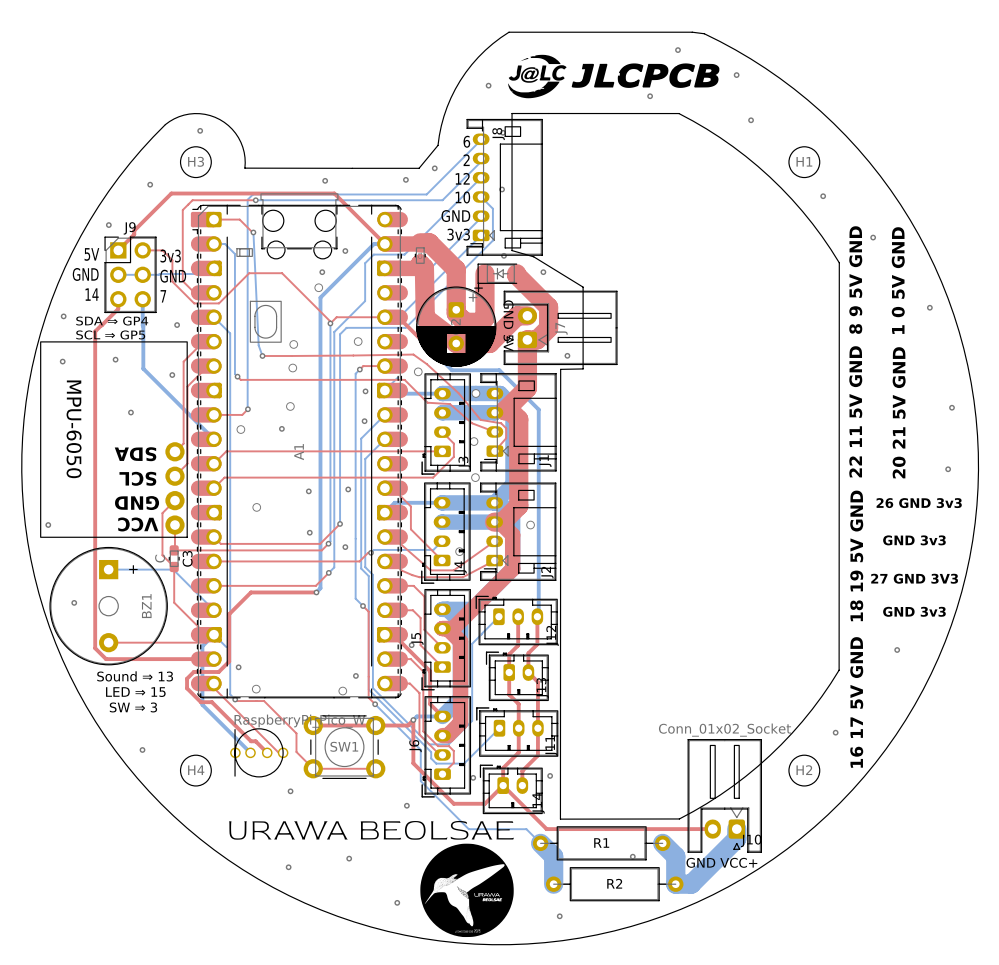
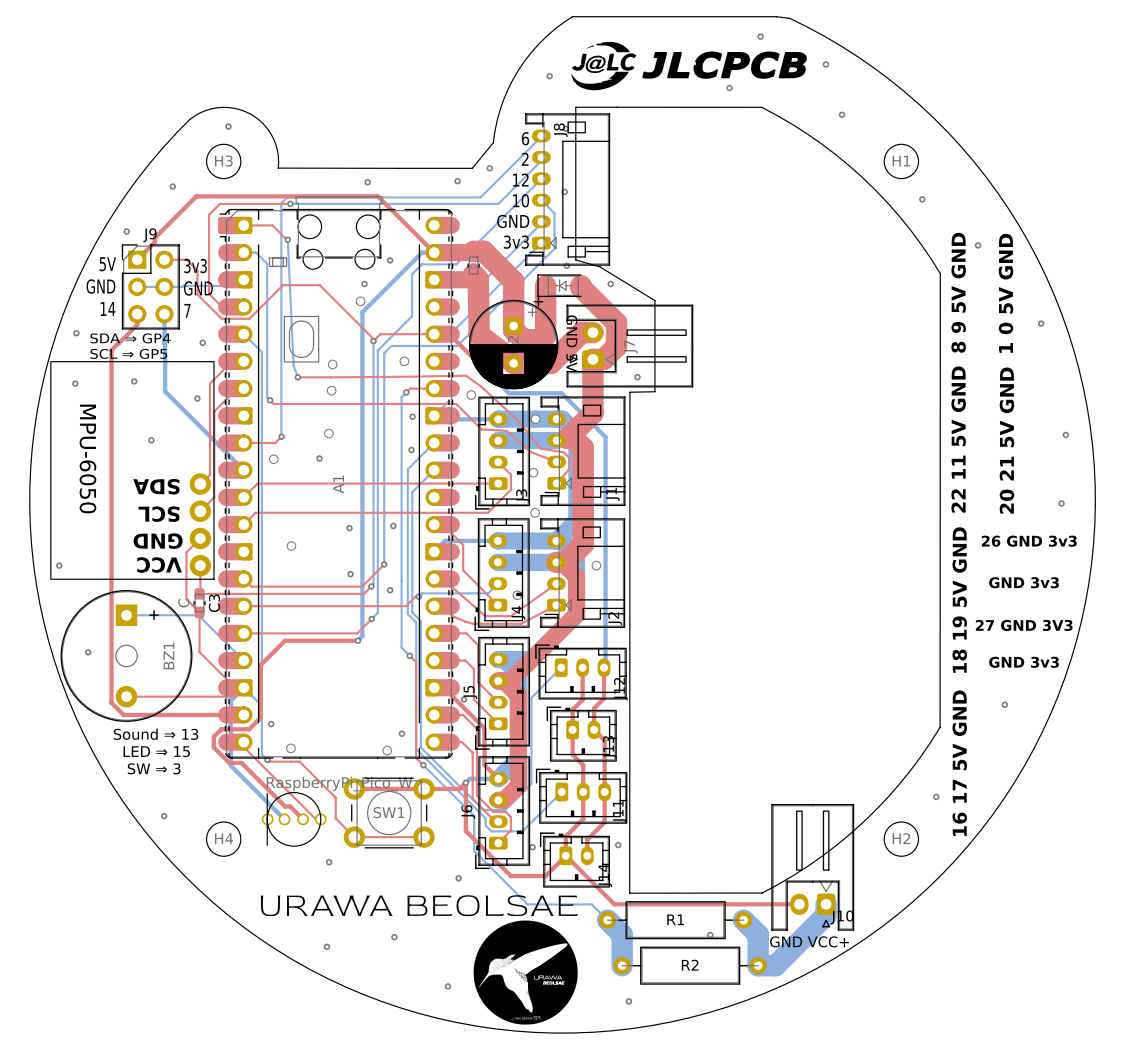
J10 value: Conn_01x02_Socket (724, 730) -> none

